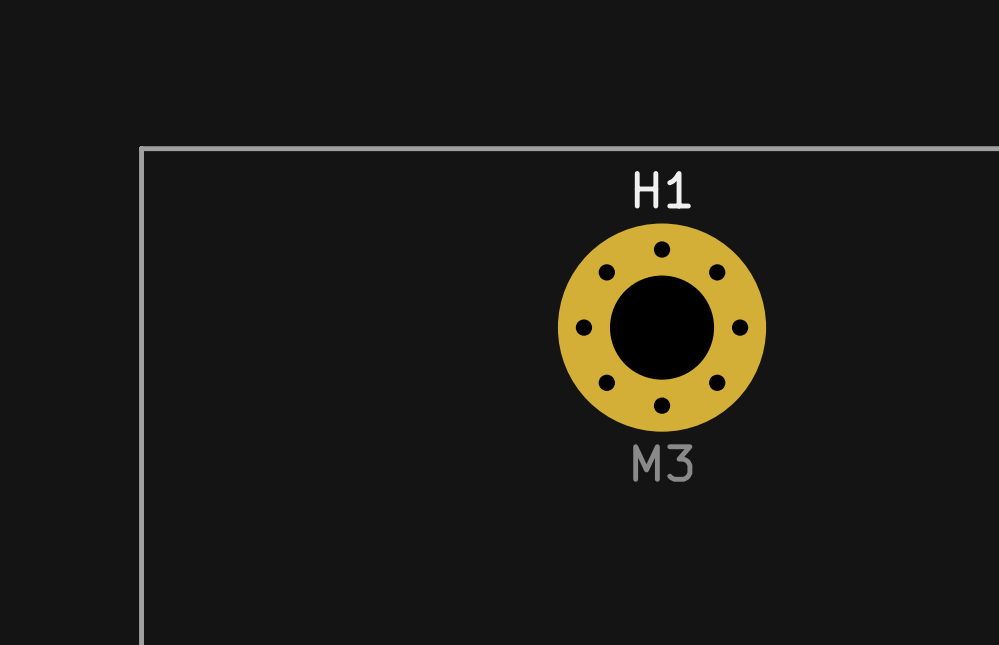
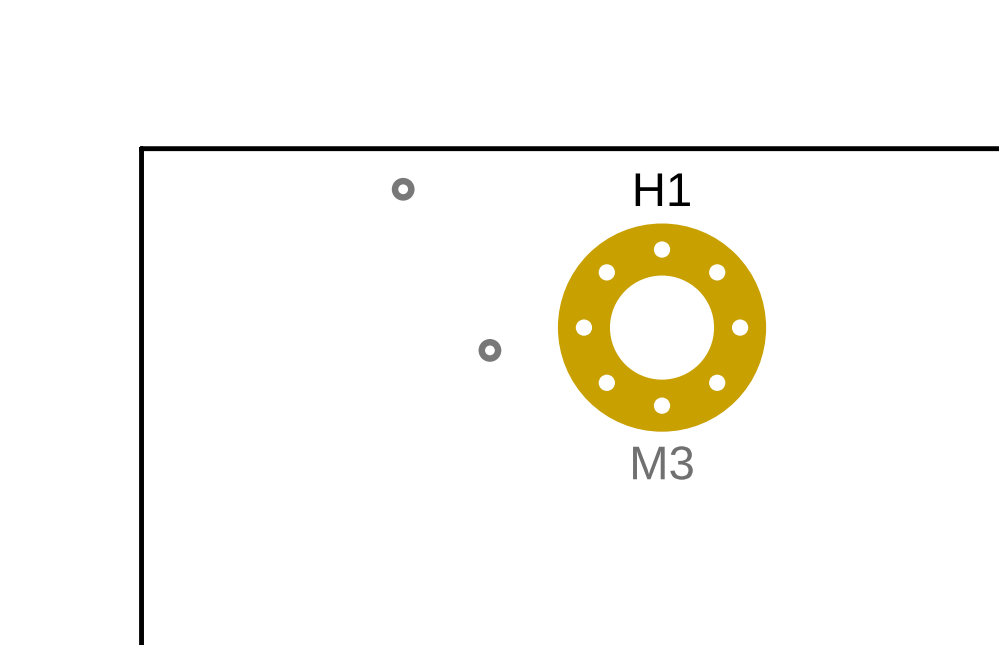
via: none -> (403, 189)
via: none -> (489, 350)

